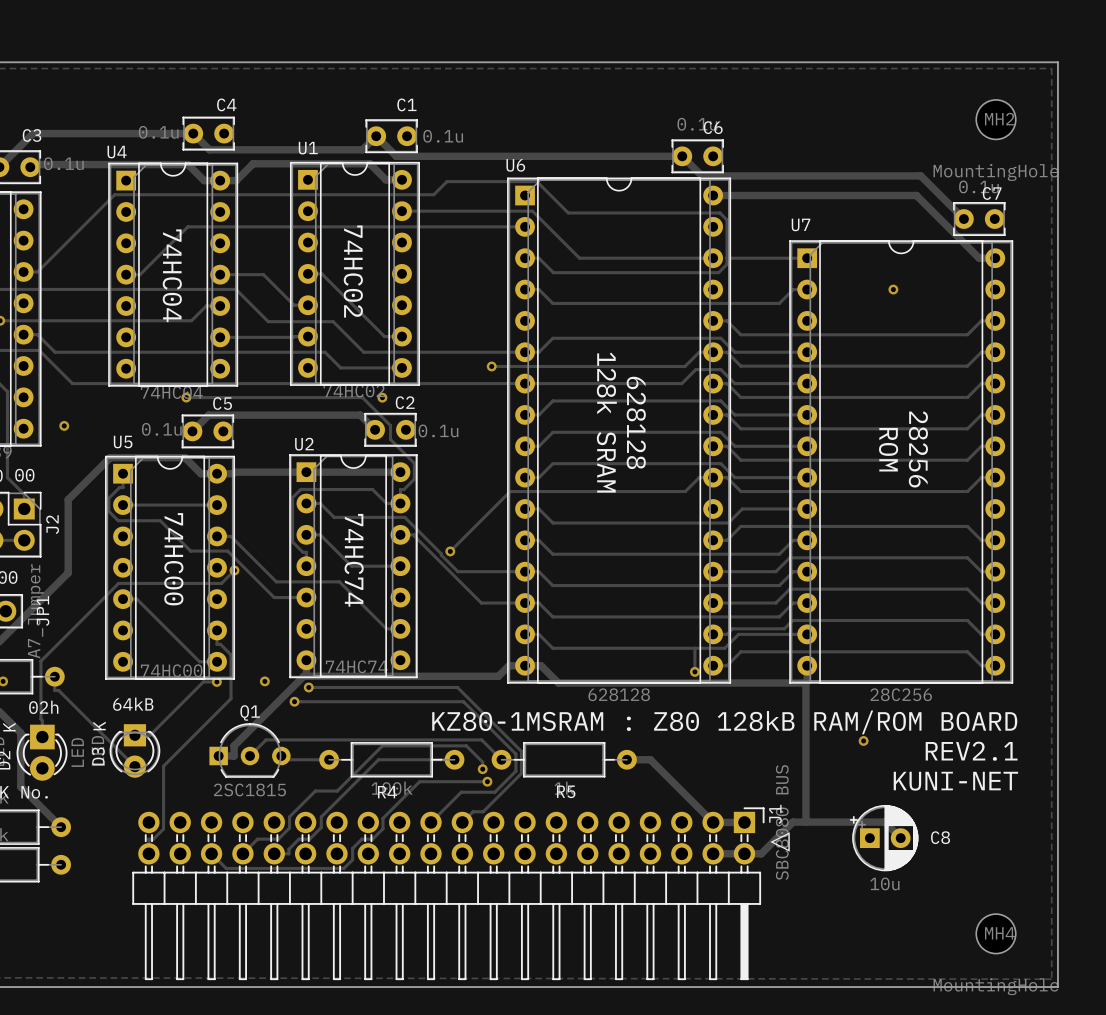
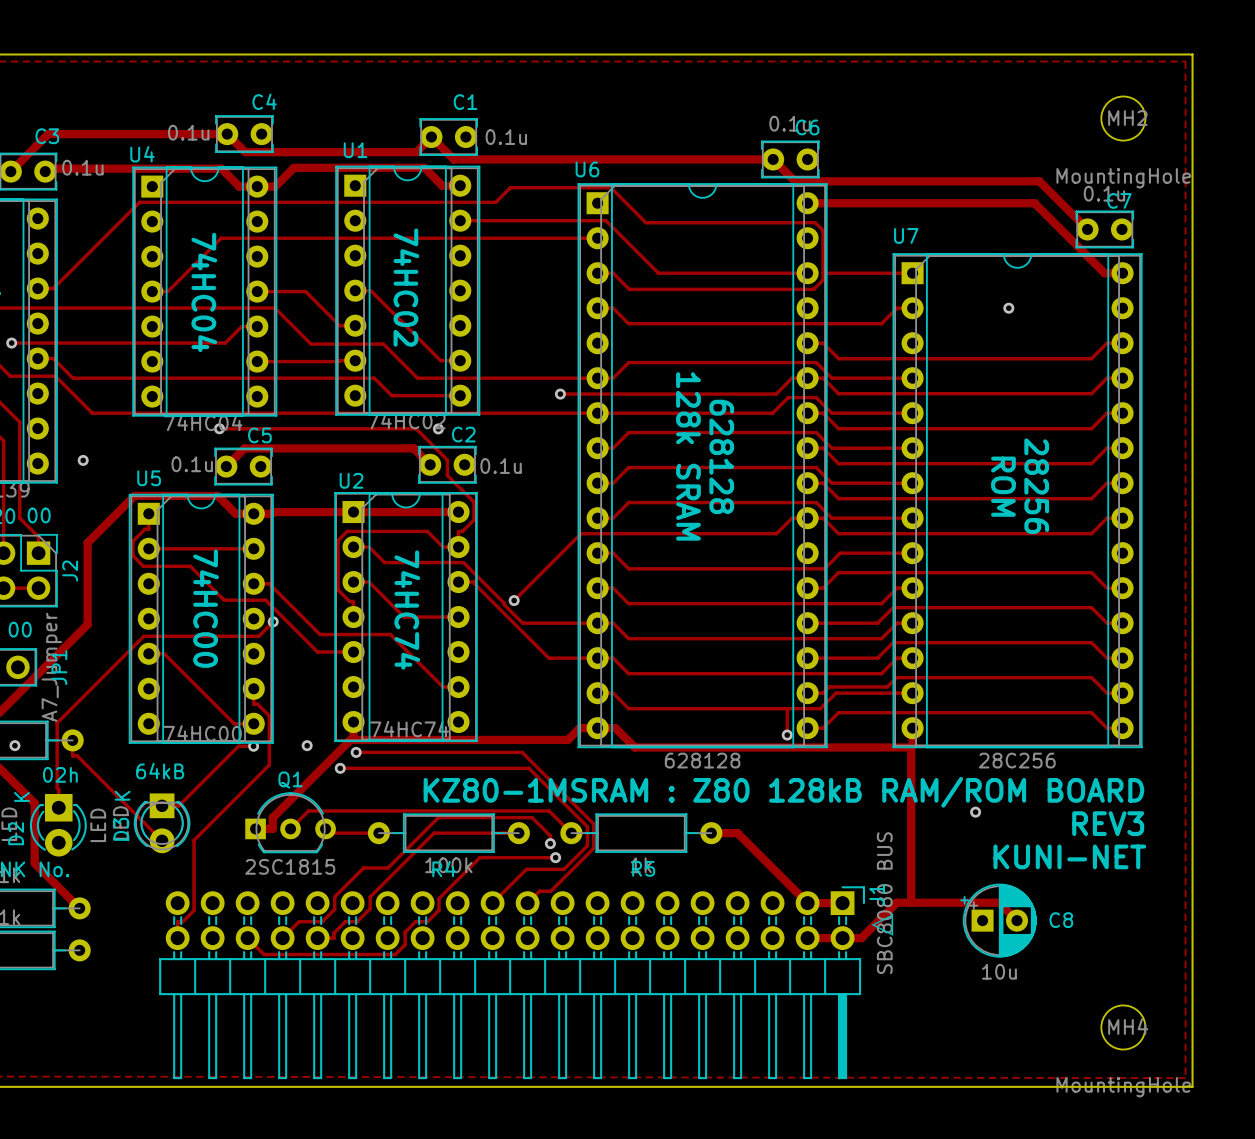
text: REV2.1 (971, 751) -> REV3 (1108, 823)

